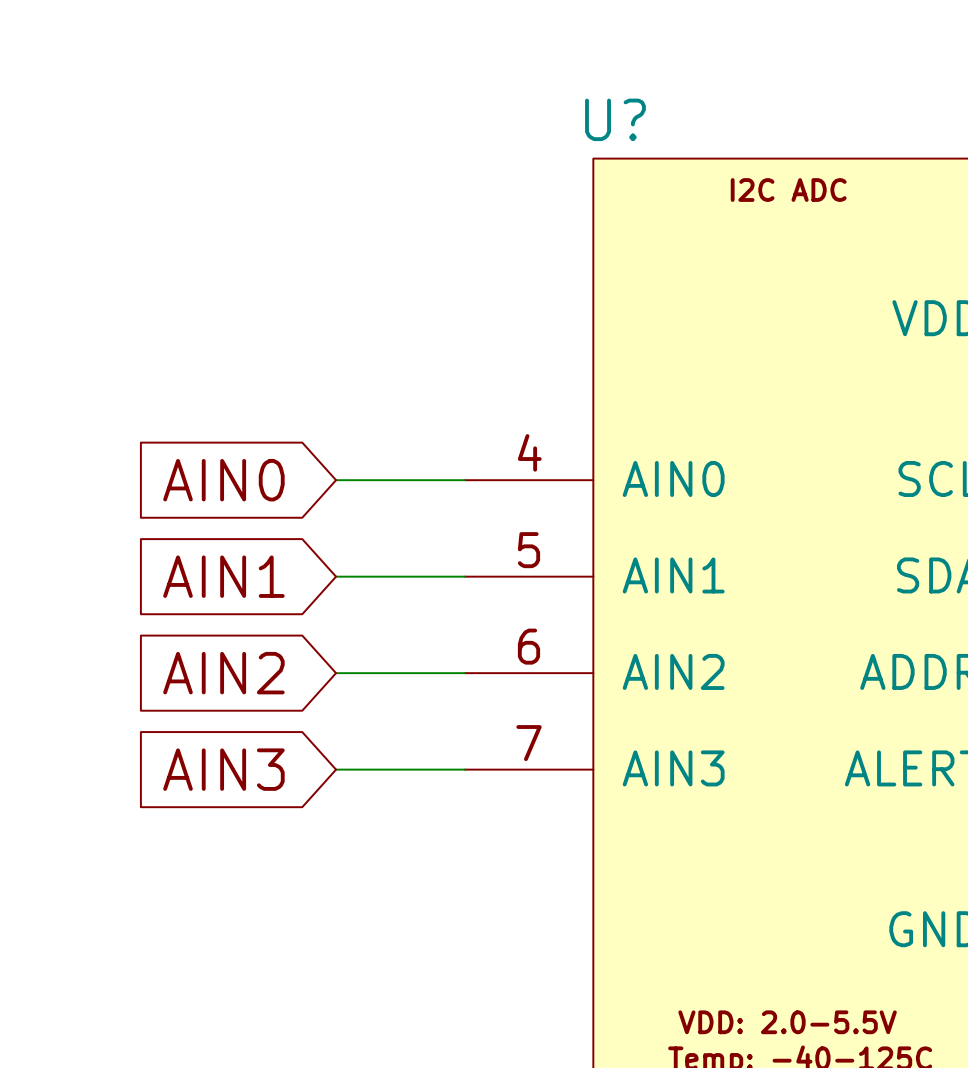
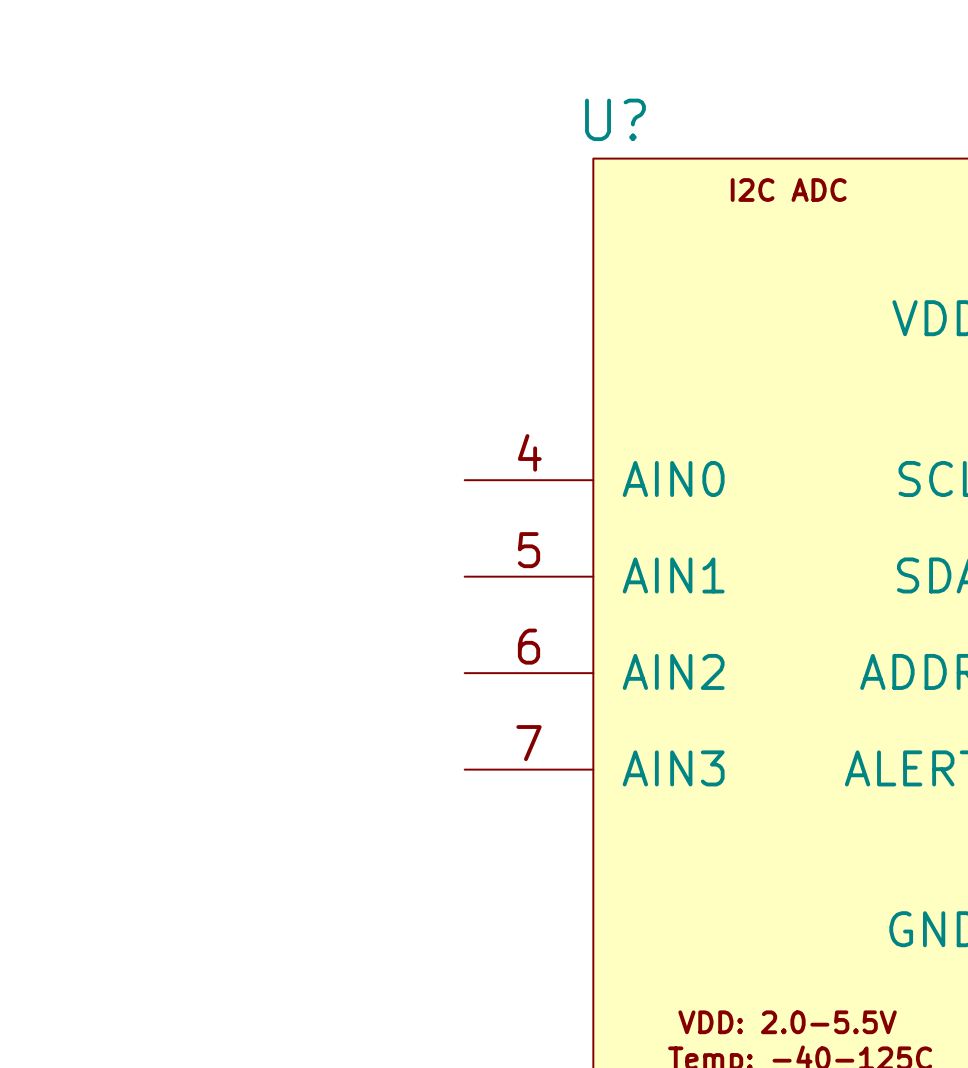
global label: AIN0 (223, 480) -> none
wire: (336, 480) (464, 480) -> none
global label: AIN1 (223, 576) -> none
wire: (336, 576) (464, 576) -> none
global label: AIN2 (223, 673) -> none
wire: (336, 673) (464, 673) -> none
global label: AIN3 (223, 769) -> none
wire: (336, 769) (464, 769) -> none

